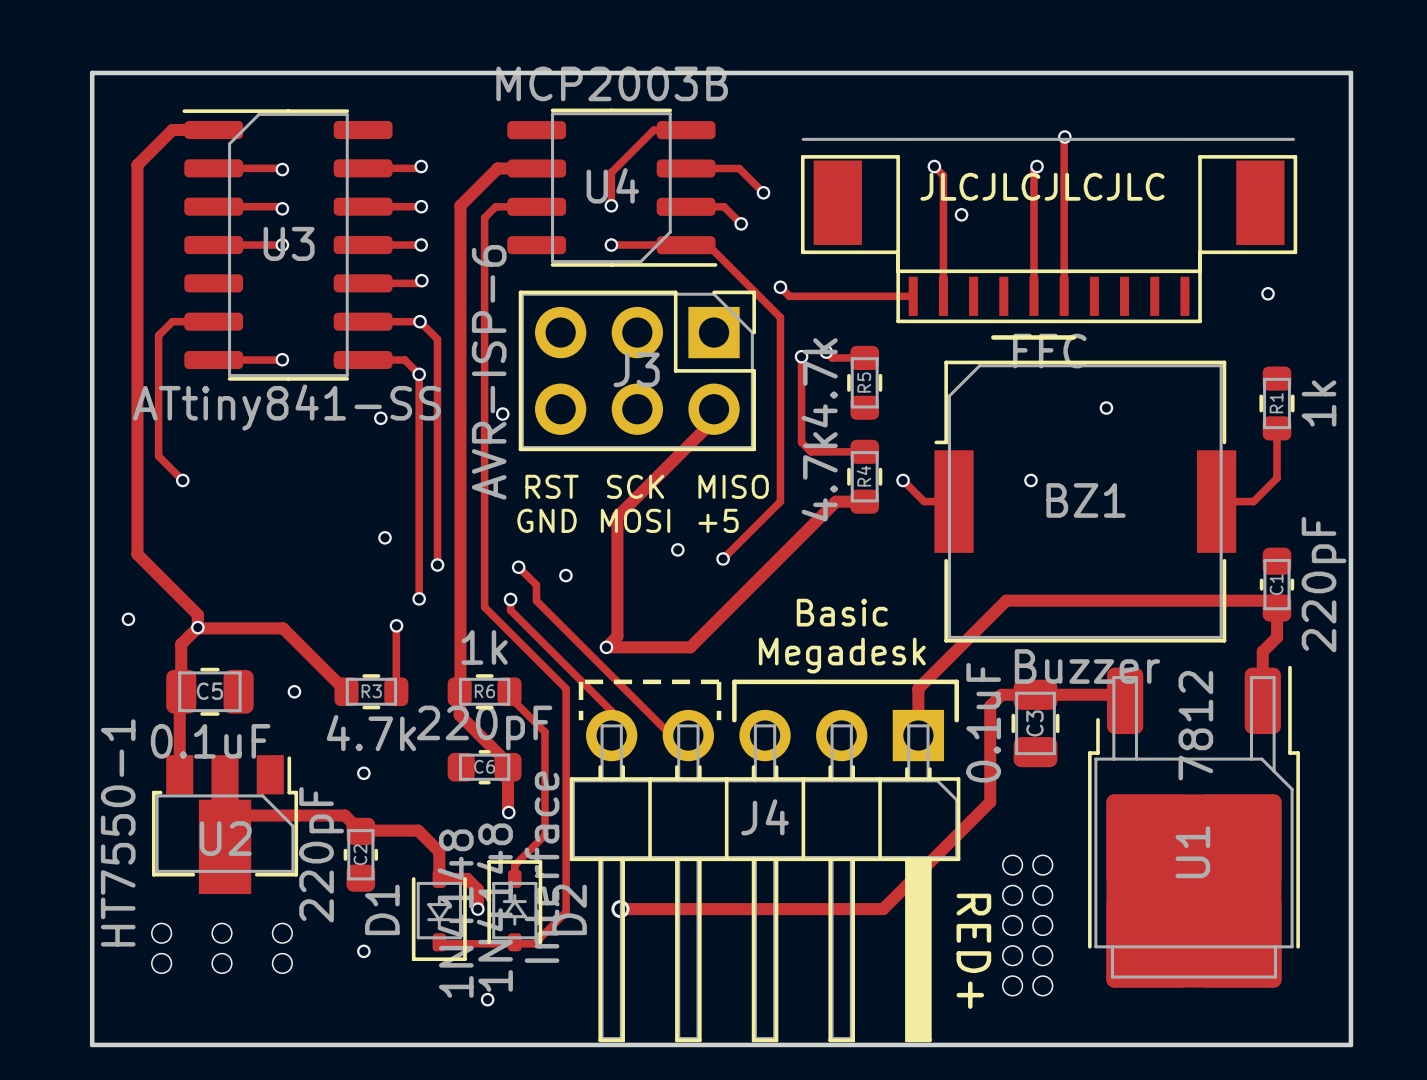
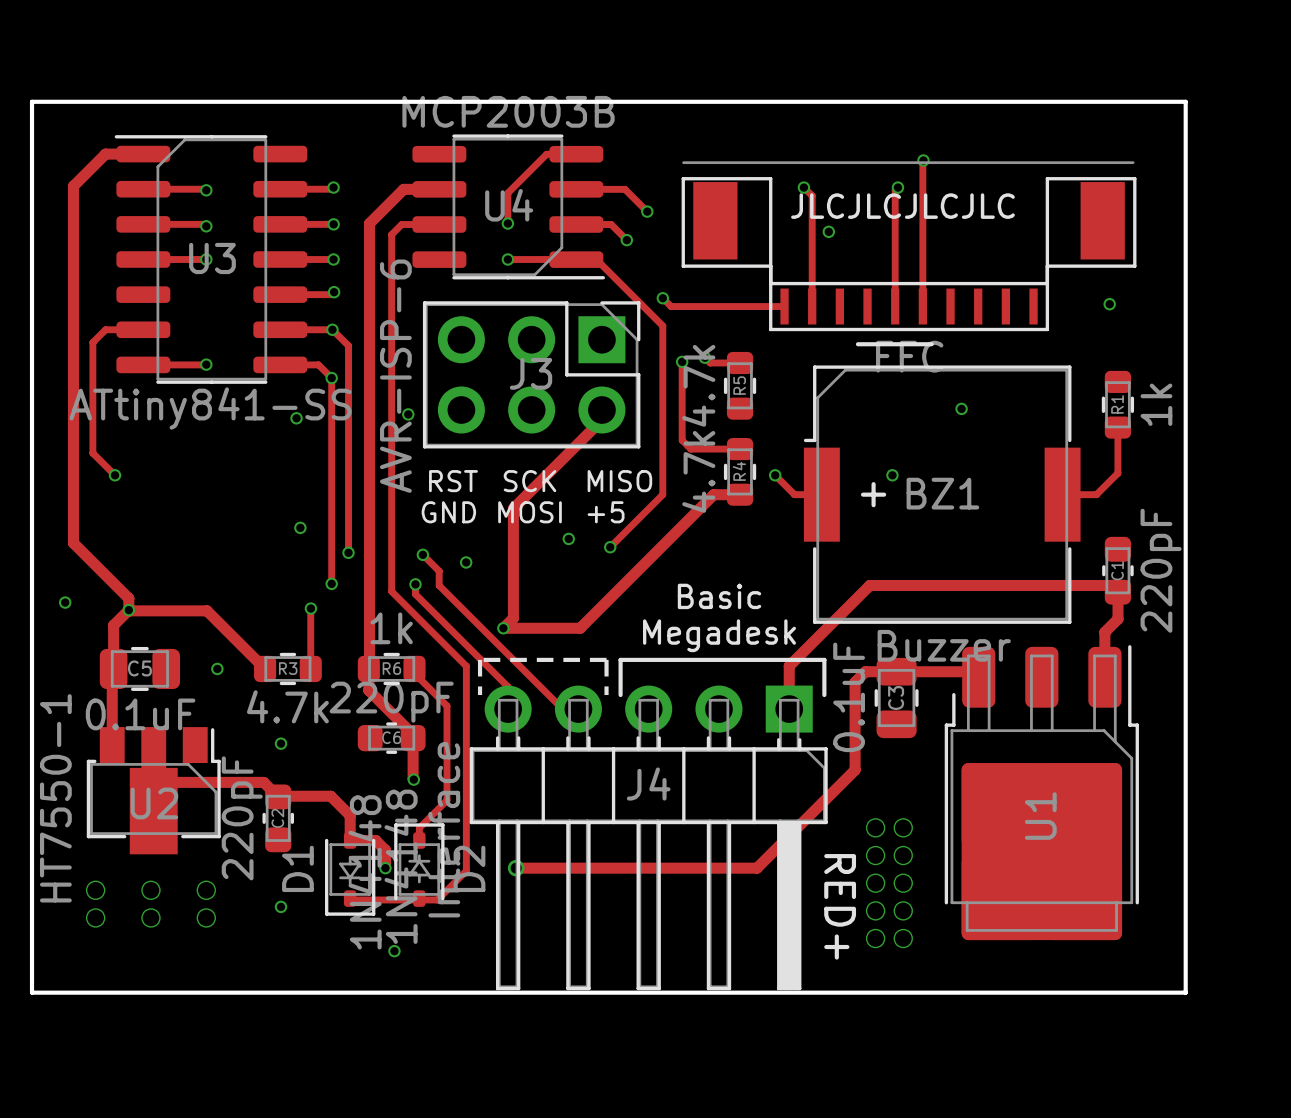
text: none -> + (873, 494)
U1 footprint: [1088, 665, 1300, 988] -> [944, 645, 1139, 941]
U1 value: 7812 (1195, 725) -> none

